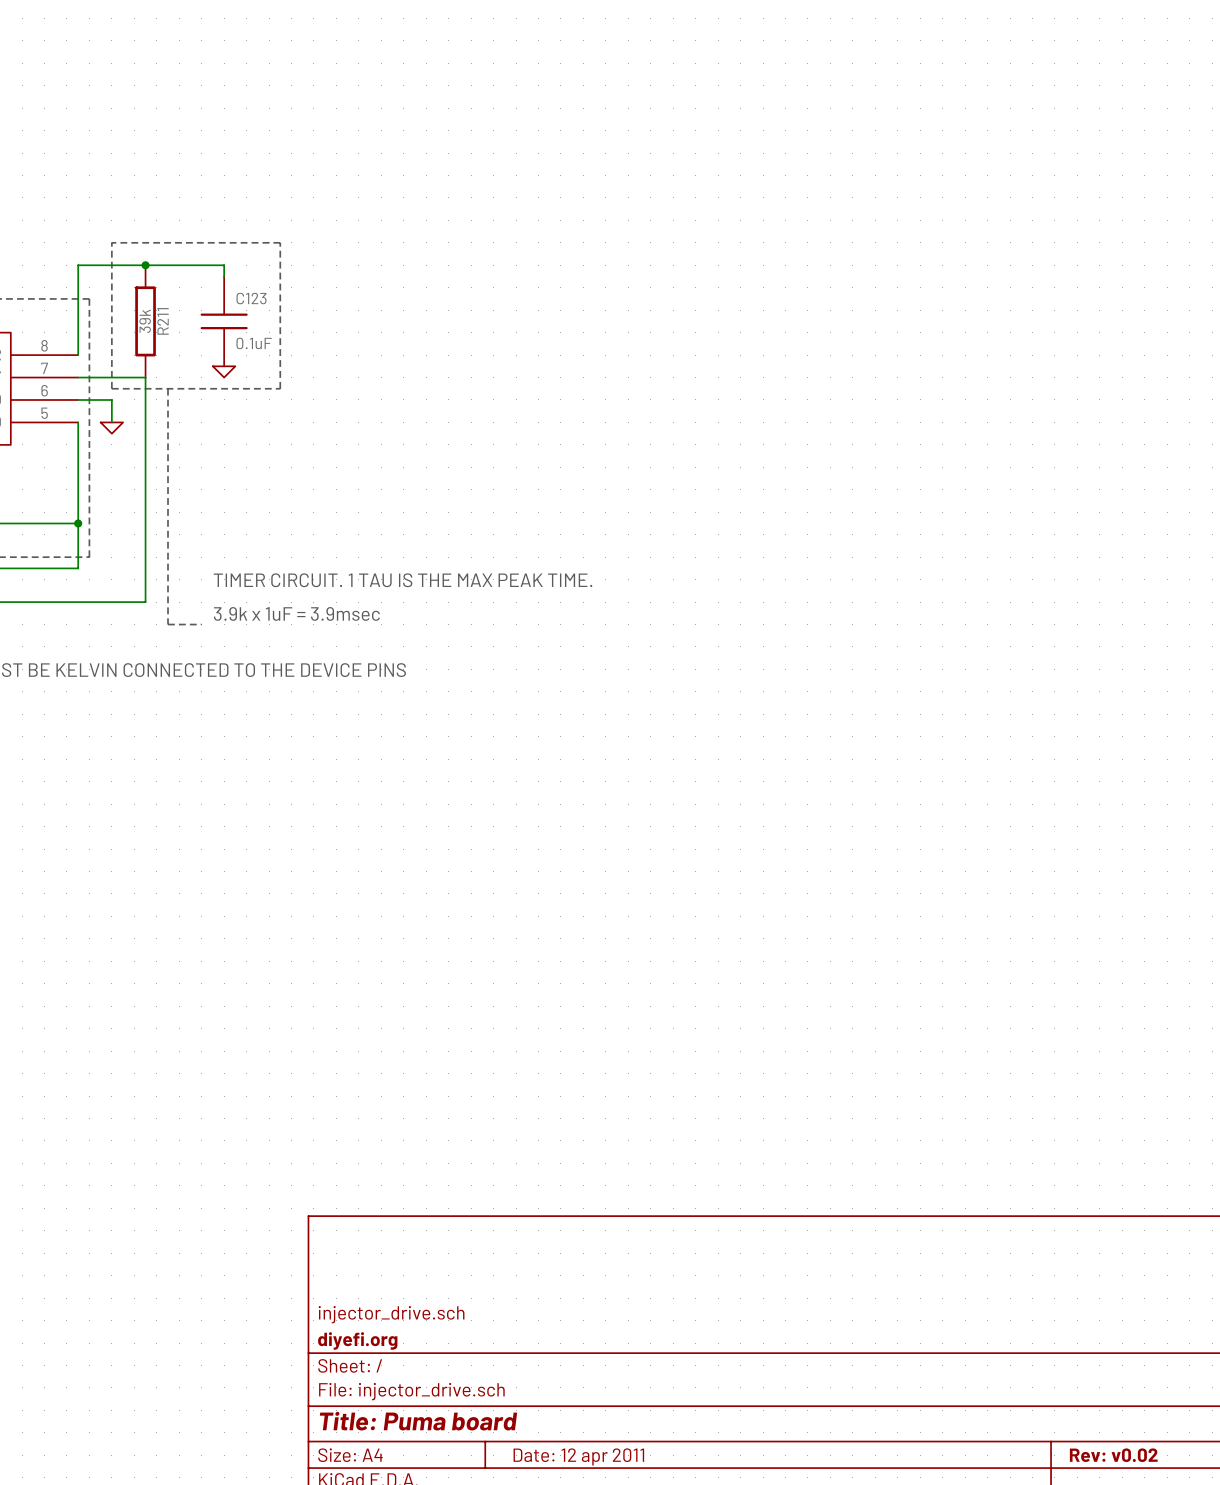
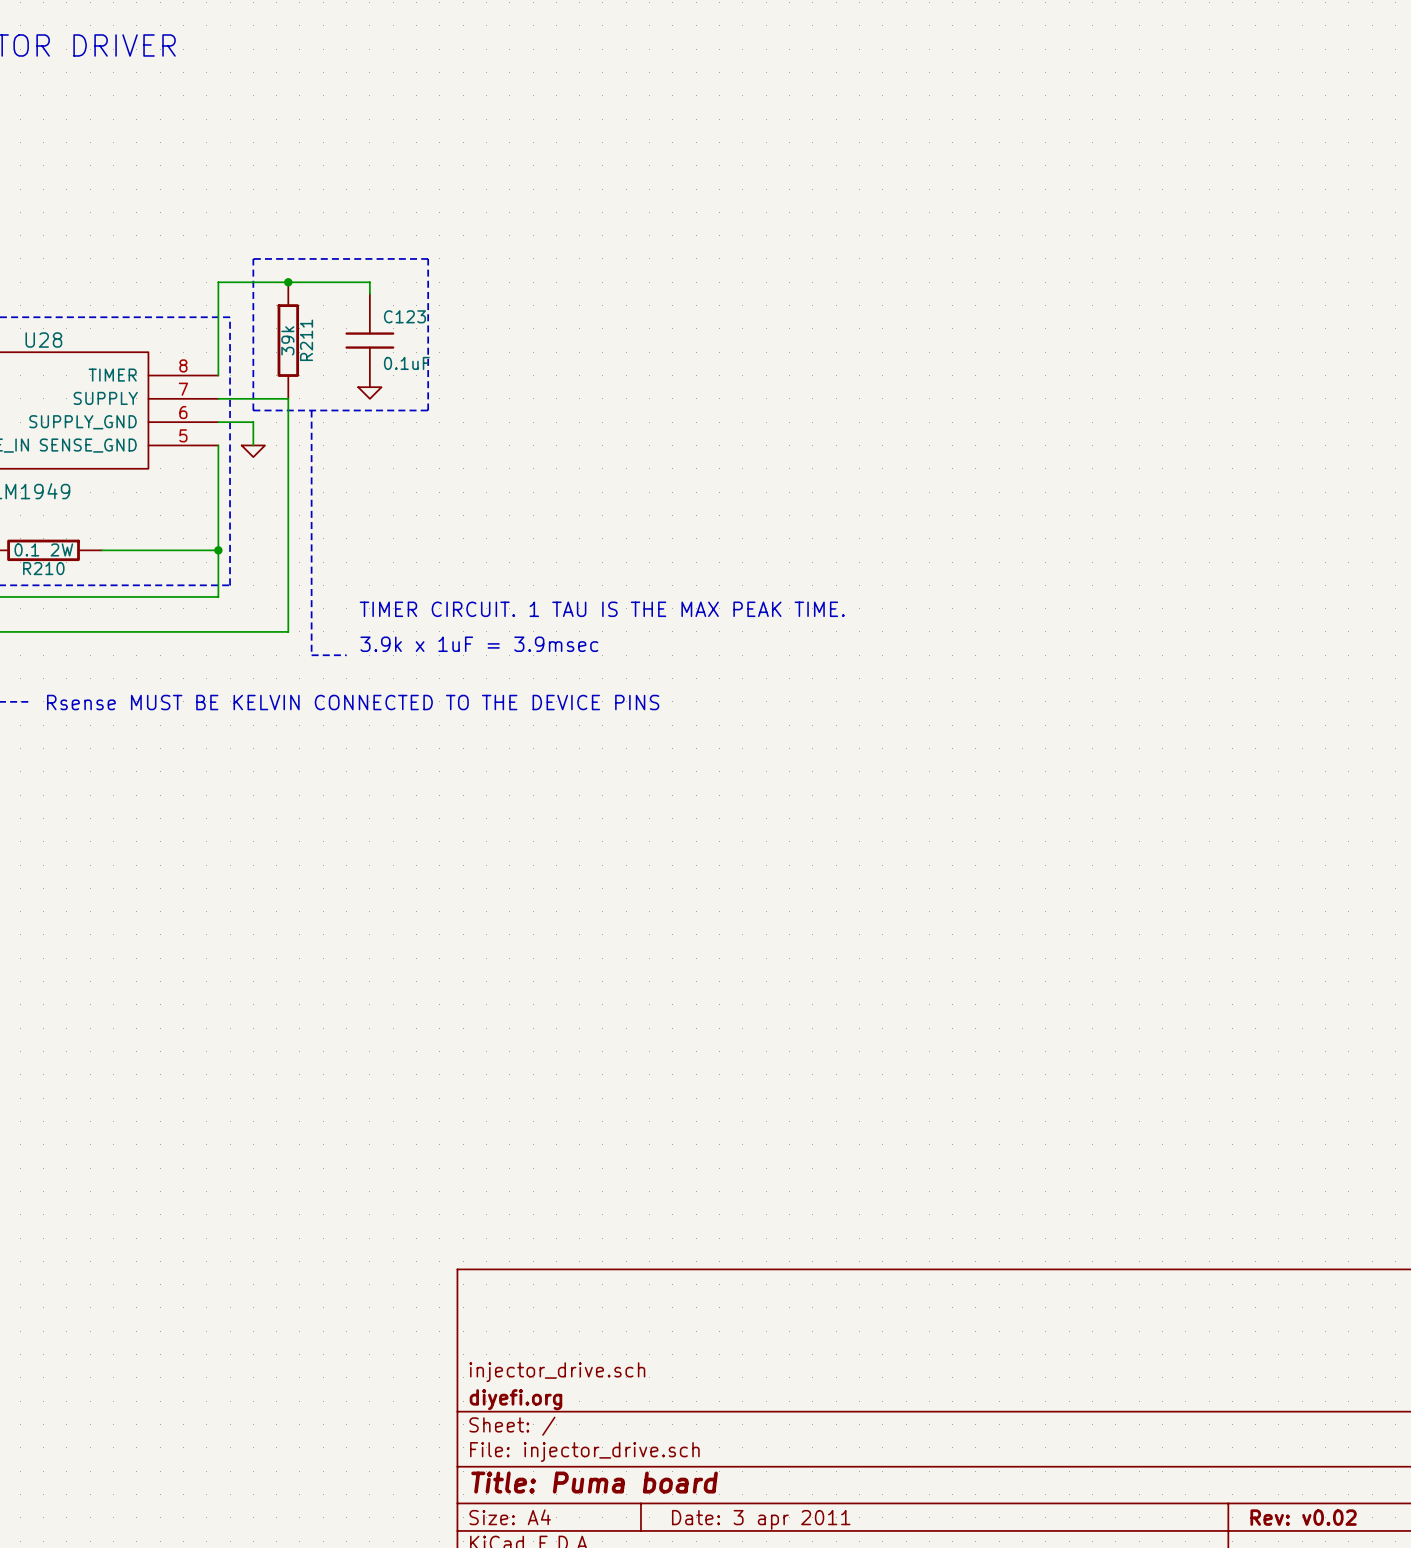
title block: Date: 12 apr 2011 (578, 1456) -> Date: 3 apr 2011 (761, 1519)

